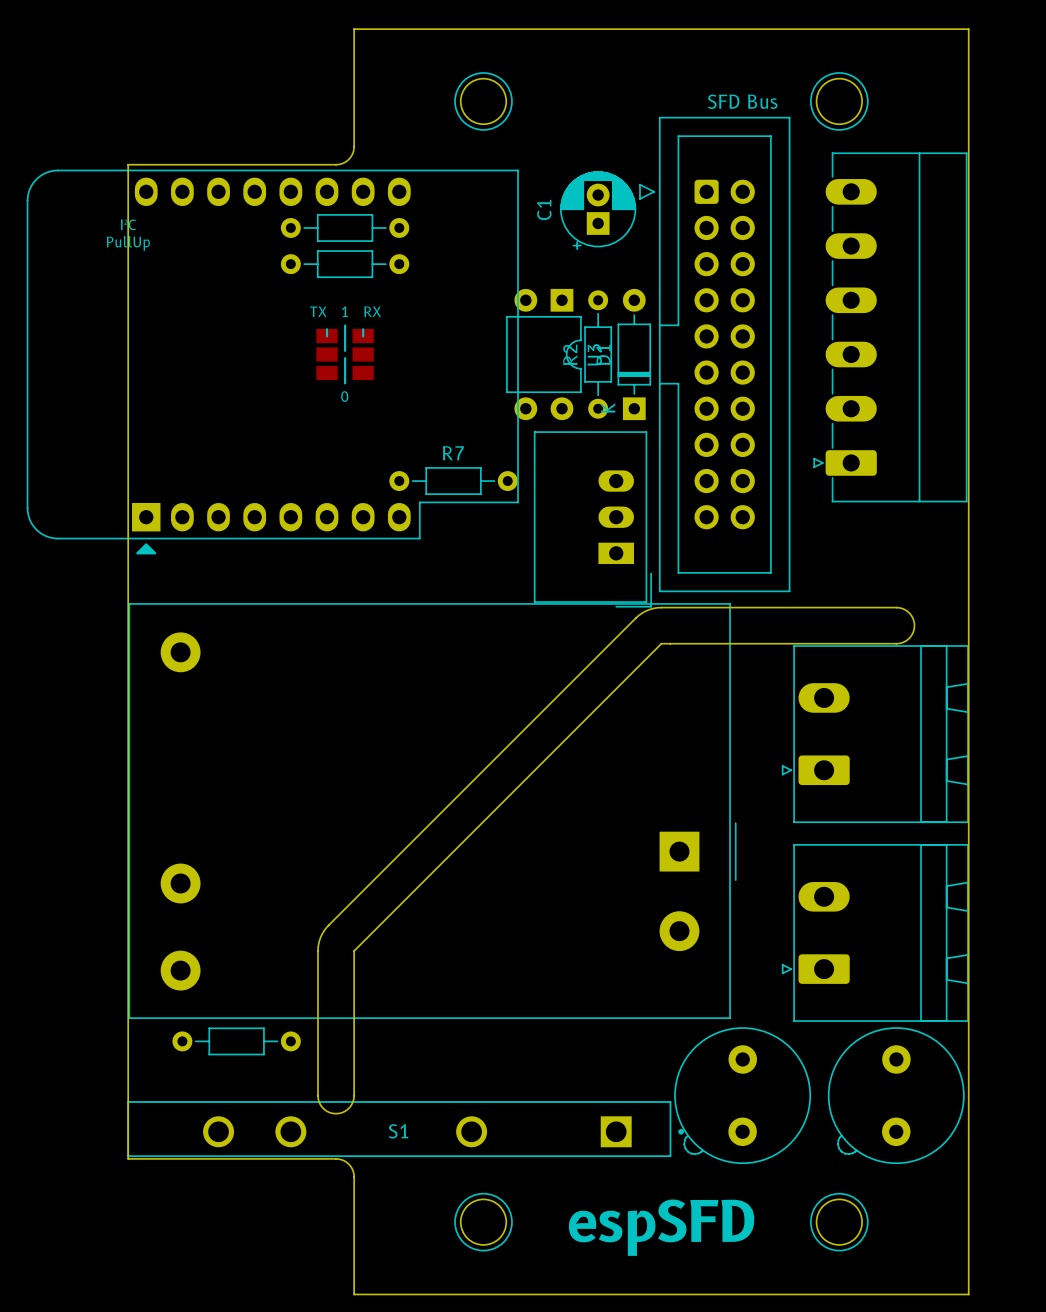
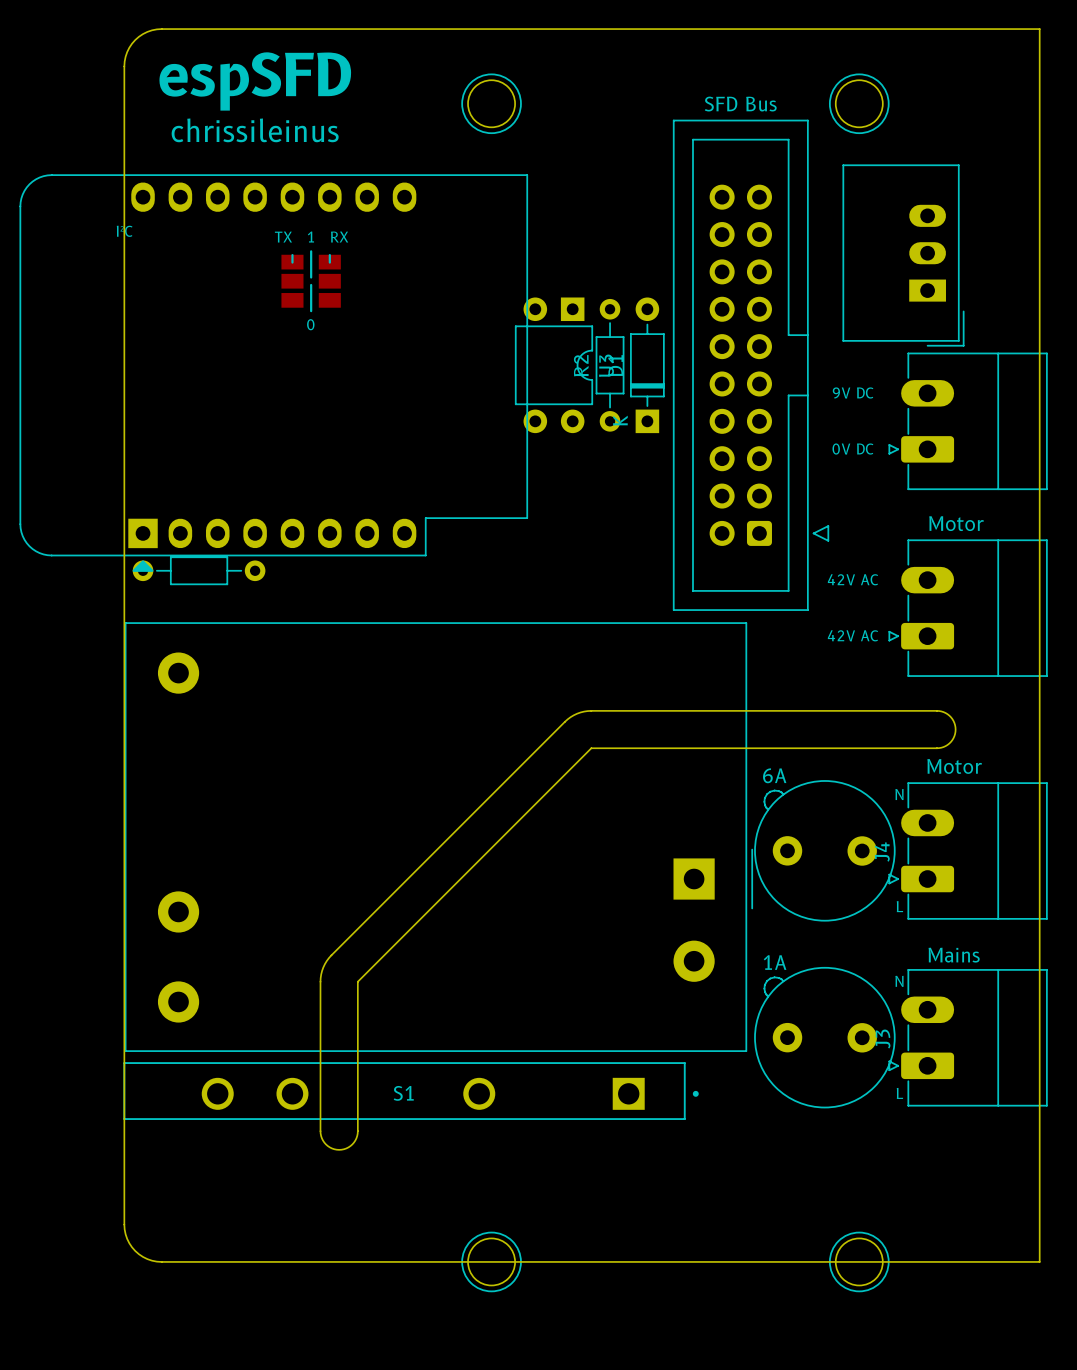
board edge: (354, 29) (354, 148) (351, 156) (345, 161) (336, 164) (128, 164) -> (357, 29) (161, 29) (143, 34) (132, 43) (124, 61) (124, 169)
board edge: (968, 29) (968, 1294) (354, 1294) (354, 1174) (351, 1167) (345, 1161) (336, 1158) (128, 1158) -> (992, 29) (1039, 29) (1039, 1261) (156, 1261) (138, 1254) (129, 1243) (124, 1229) (124, 1196)
text: none -> espSFD (255, 81)
text position: SFD Bus (742, 101) -> SFD Bus (740, 104)
text: none -> chrissileinus (255, 130)
C1: (598, 210) -> none
part: (345, 227) -> none
text: PullUp (128, 243) -> none
part: none -> (903, 255)
part: (345, 264) -> none
part: none -> (292, 281)
part: none -> (329, 281)
text position: TX (318, 311) -> TX (283, 237)
text position: 1 (344, 311) -> 1 (310, 237)
text position: RX (372, 311) -> RX (339, 237)
line: (345, 325) (345, 350) -> (311, 251) (311, 277)
part: (890, 327) -> none
line: (327, 329) (327, 336) -> (292, 255) (292, 262)
line: (363, 329) (363, 336) -> (329, 255) (329, 262)
part: (327, 354) -> none
part: (363, 354) -> none
part rotation: 0° (714, 354) -> 180° (751, 365)
line: (345, 358) (345, 383) -> (311, 284) (311, 311)
text: none -> 9V DC (853, 392)
text position: 0 (344, 396) -> 0 (310, 324)
part: none -> (968, 421)
text: none -> 0V DC (852, 449)
R7: (453, 481) -> none
text: none -> Motor (956, 523)
part: (592, 519) -> none
part: none -> (199, 570)
text: none -> 42V AC (852, 579)
part: none -> (968, 608)
text: none -> 42V AC (852, 635)
board edge: (554, 699) (635, 618) (644, 611) (654, 608) (896, 607) (907, 611) (913, 620) (912, 634) (905, 641) (898, 643) (661, 643) (580, 725) -> (564, 721) (577, 713) (591, 710) (936, 710) (949, 715) (953, 720) (955, 729) (953, 738) (949, 743) (936, 748) (591, 748)
part: (875, 734) -> none
text: none -> Motor (954, 766)
text: none -> 6A (774, 775)
text: none -> N (899, 794)
part: none -> (824, 850)
J4: none -> (968, 850)
text: none -> L (899, 906)
text: none -> Mains (954, 955)
text: none -> 1A (775, 962)
part: (875, 932) -> none
text: none -> N (899, 981)
part: none -> (824, 1037)
J3: none -> (968, 1037)
part: (236, 1041) -> none
text: none -> L (899, 1093)
part: (742, 1095) -> none
part: (896, 1095) -> none
S1 position: (405, 1129) -> (411, 1091)
text: espSFD (661, 1227) -> none

